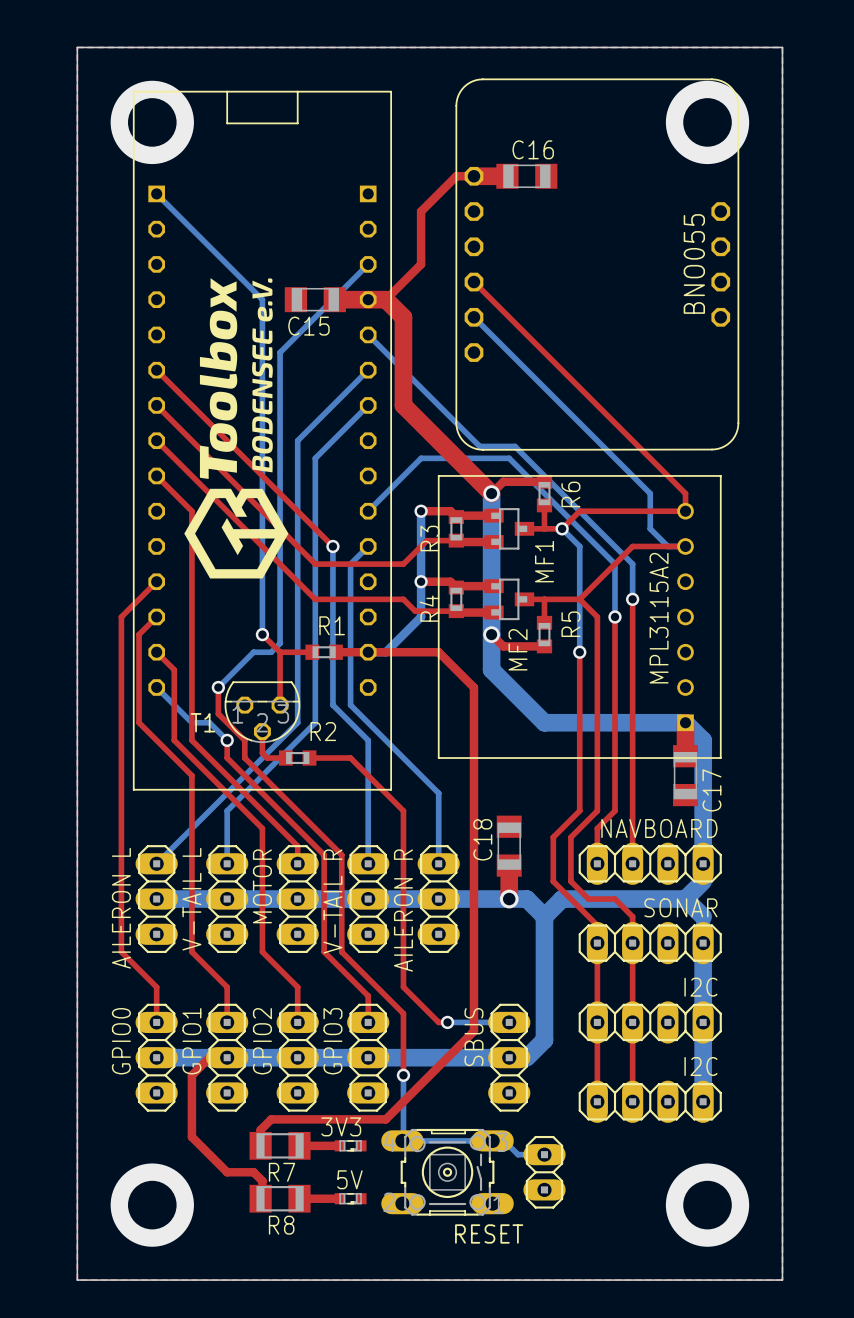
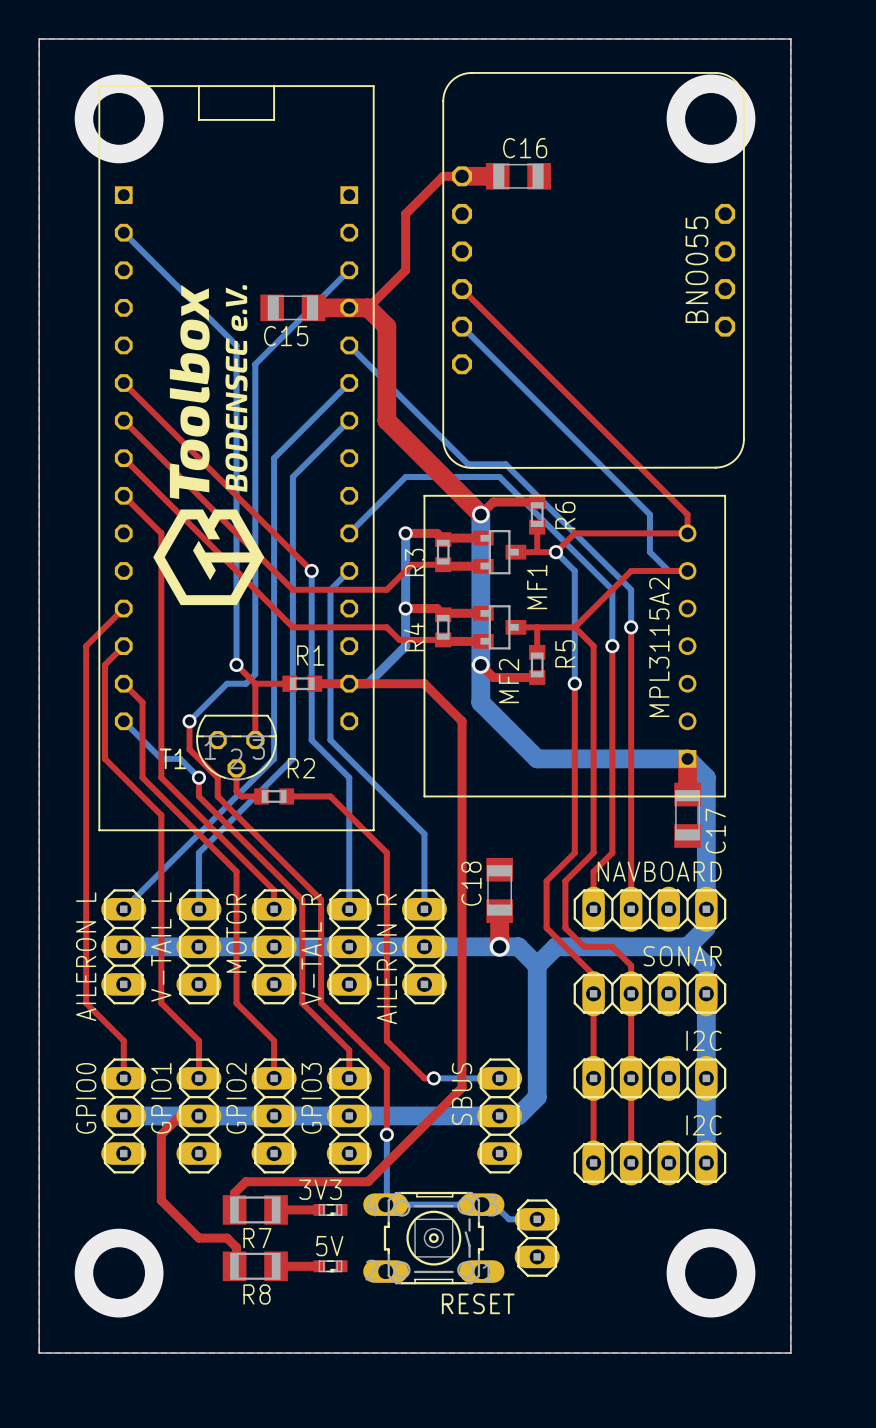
bottom track: (156, 193) (262, 299) (262, 334) -> (123, 232) (236, 345)

